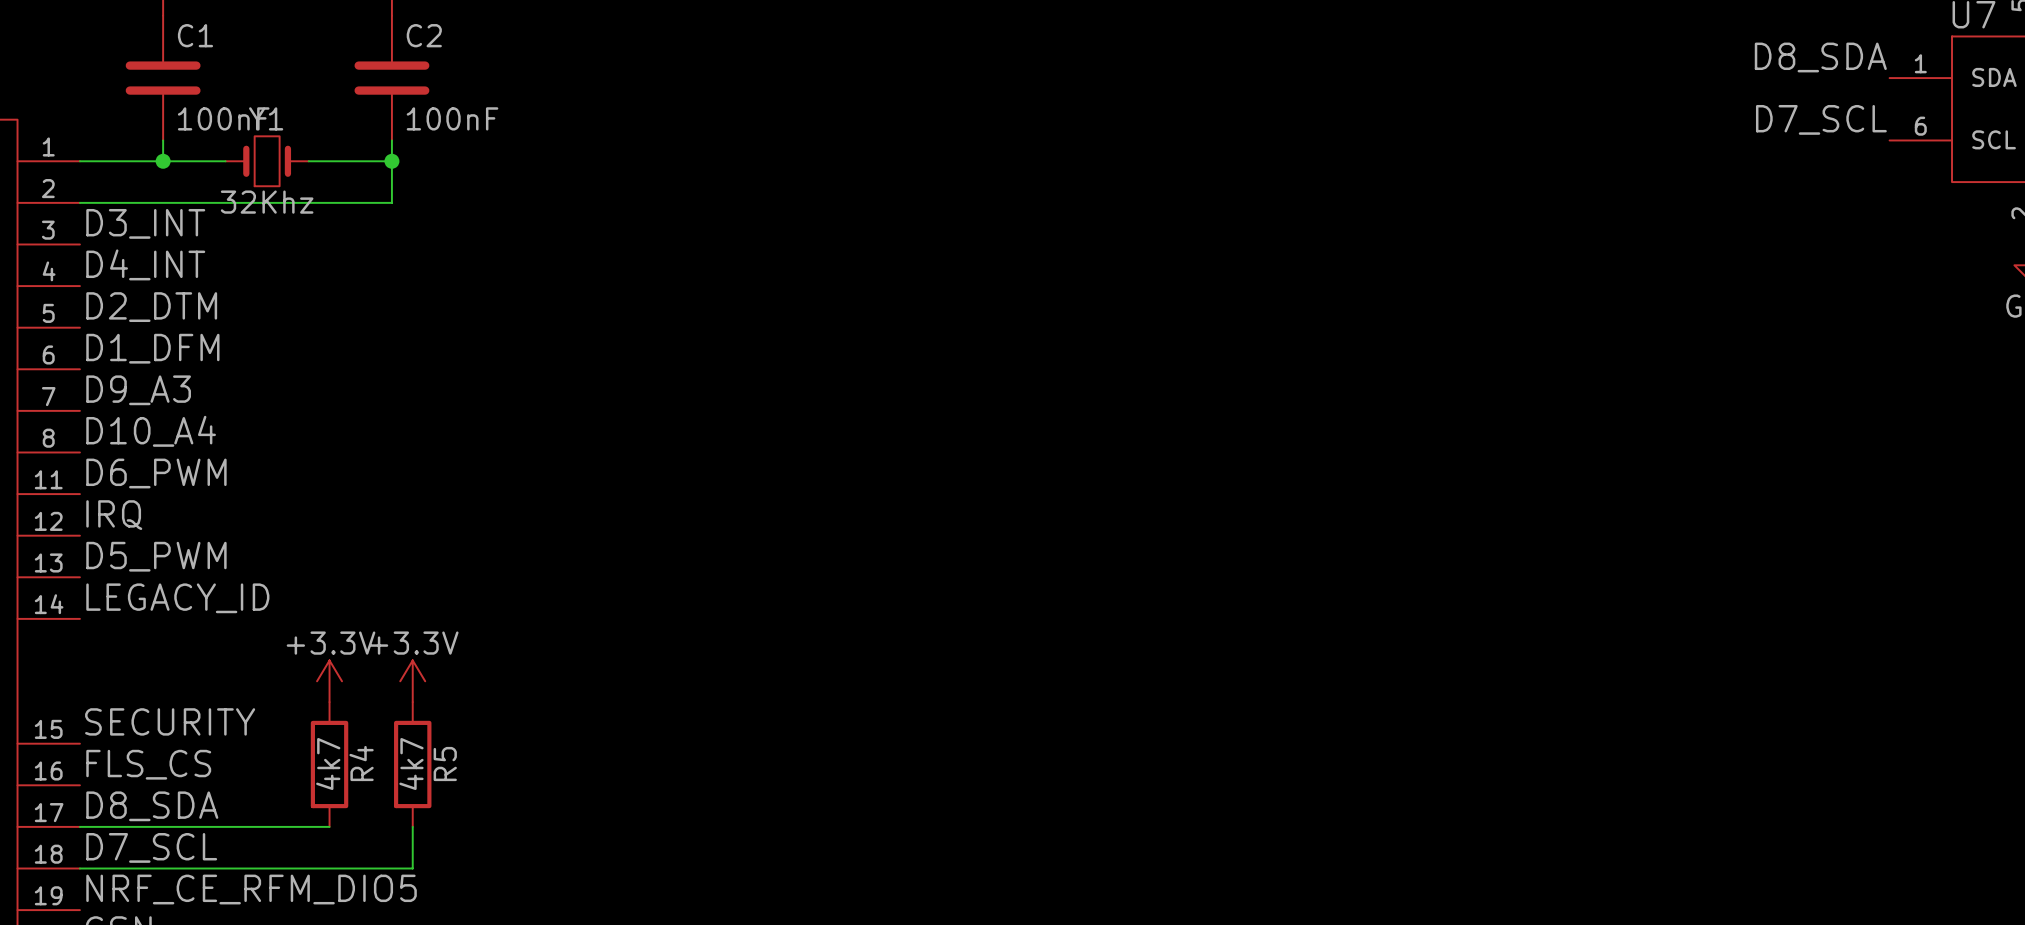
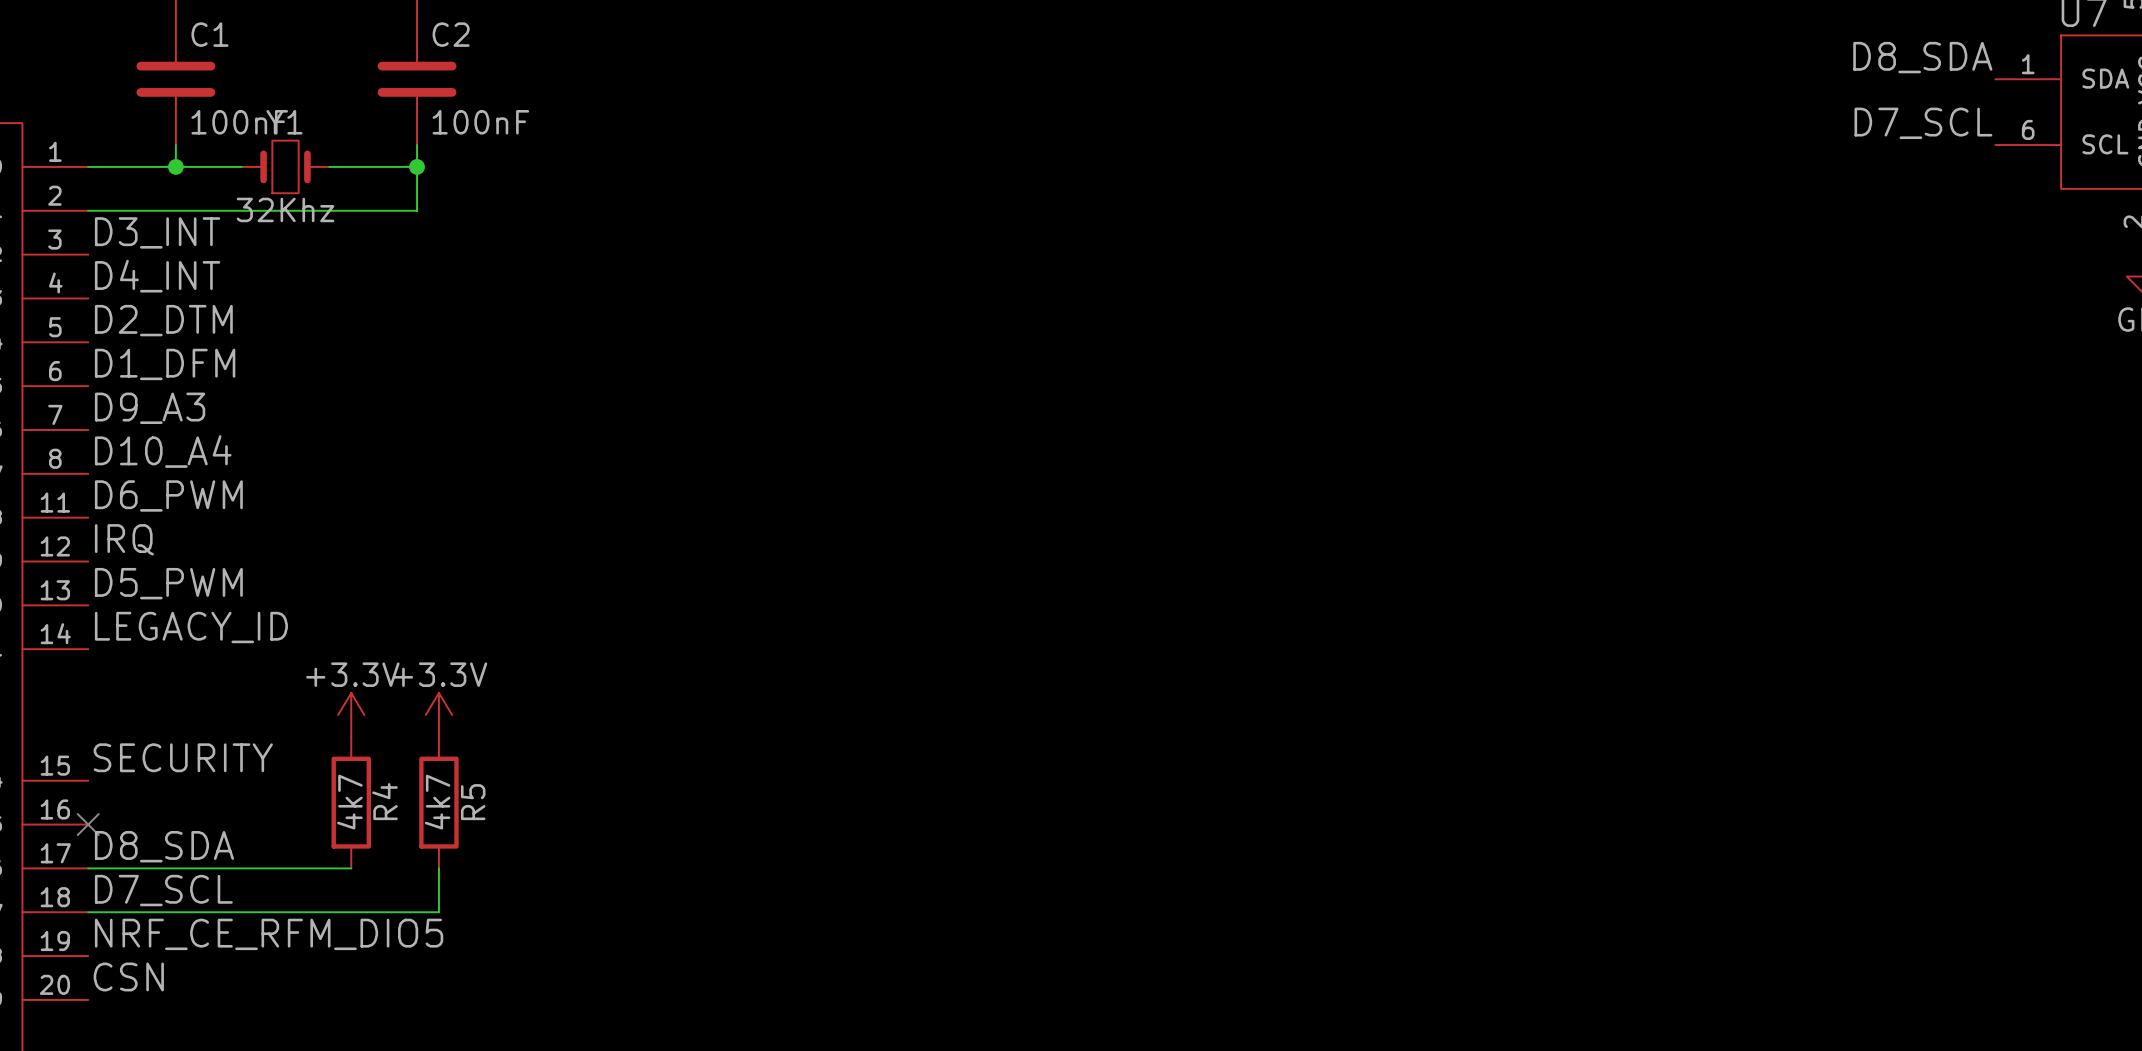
label: FLS_CS (148, 764) -> none
no-connect mark: none -> (88, 824)

